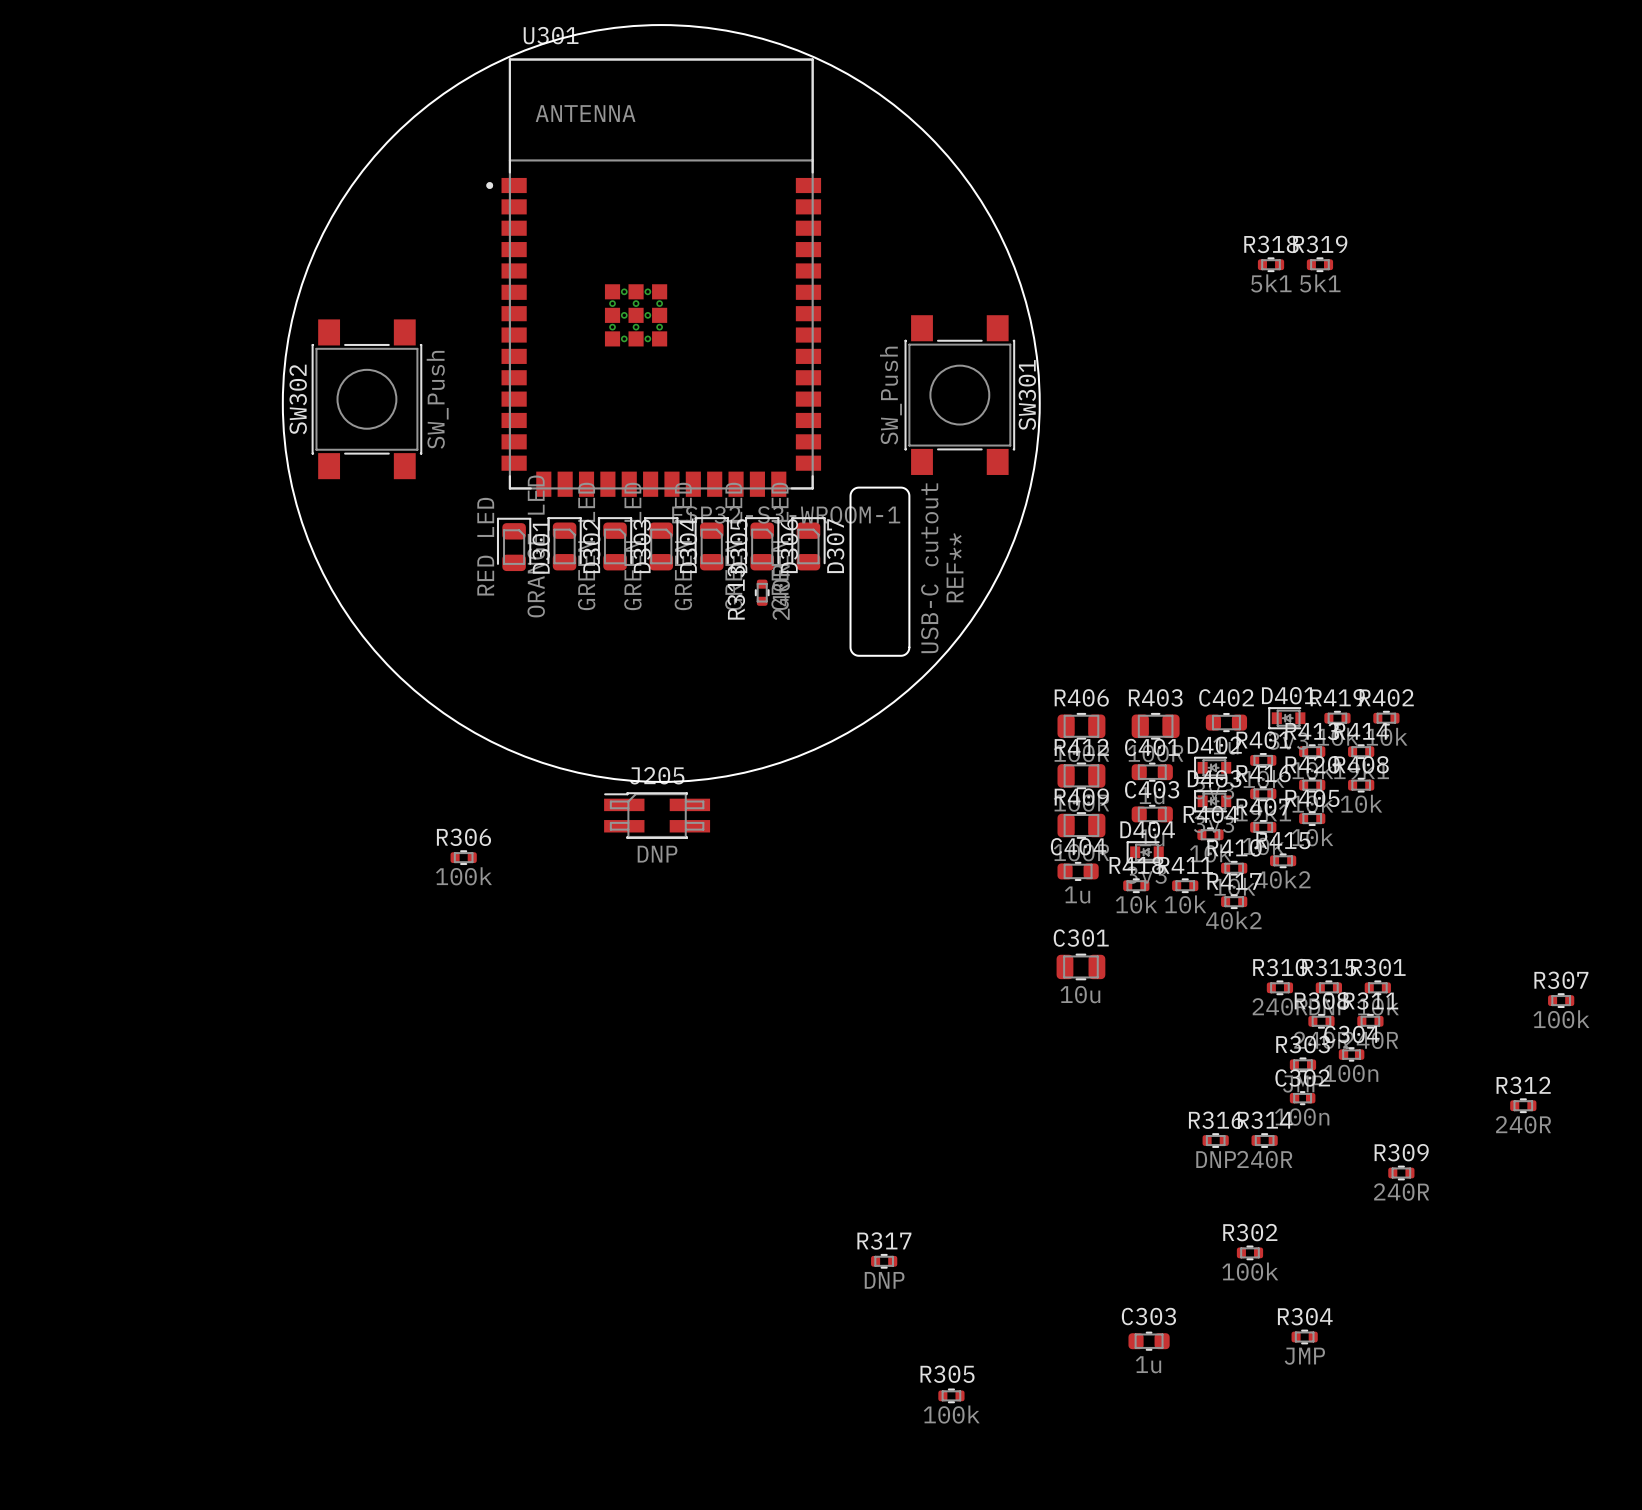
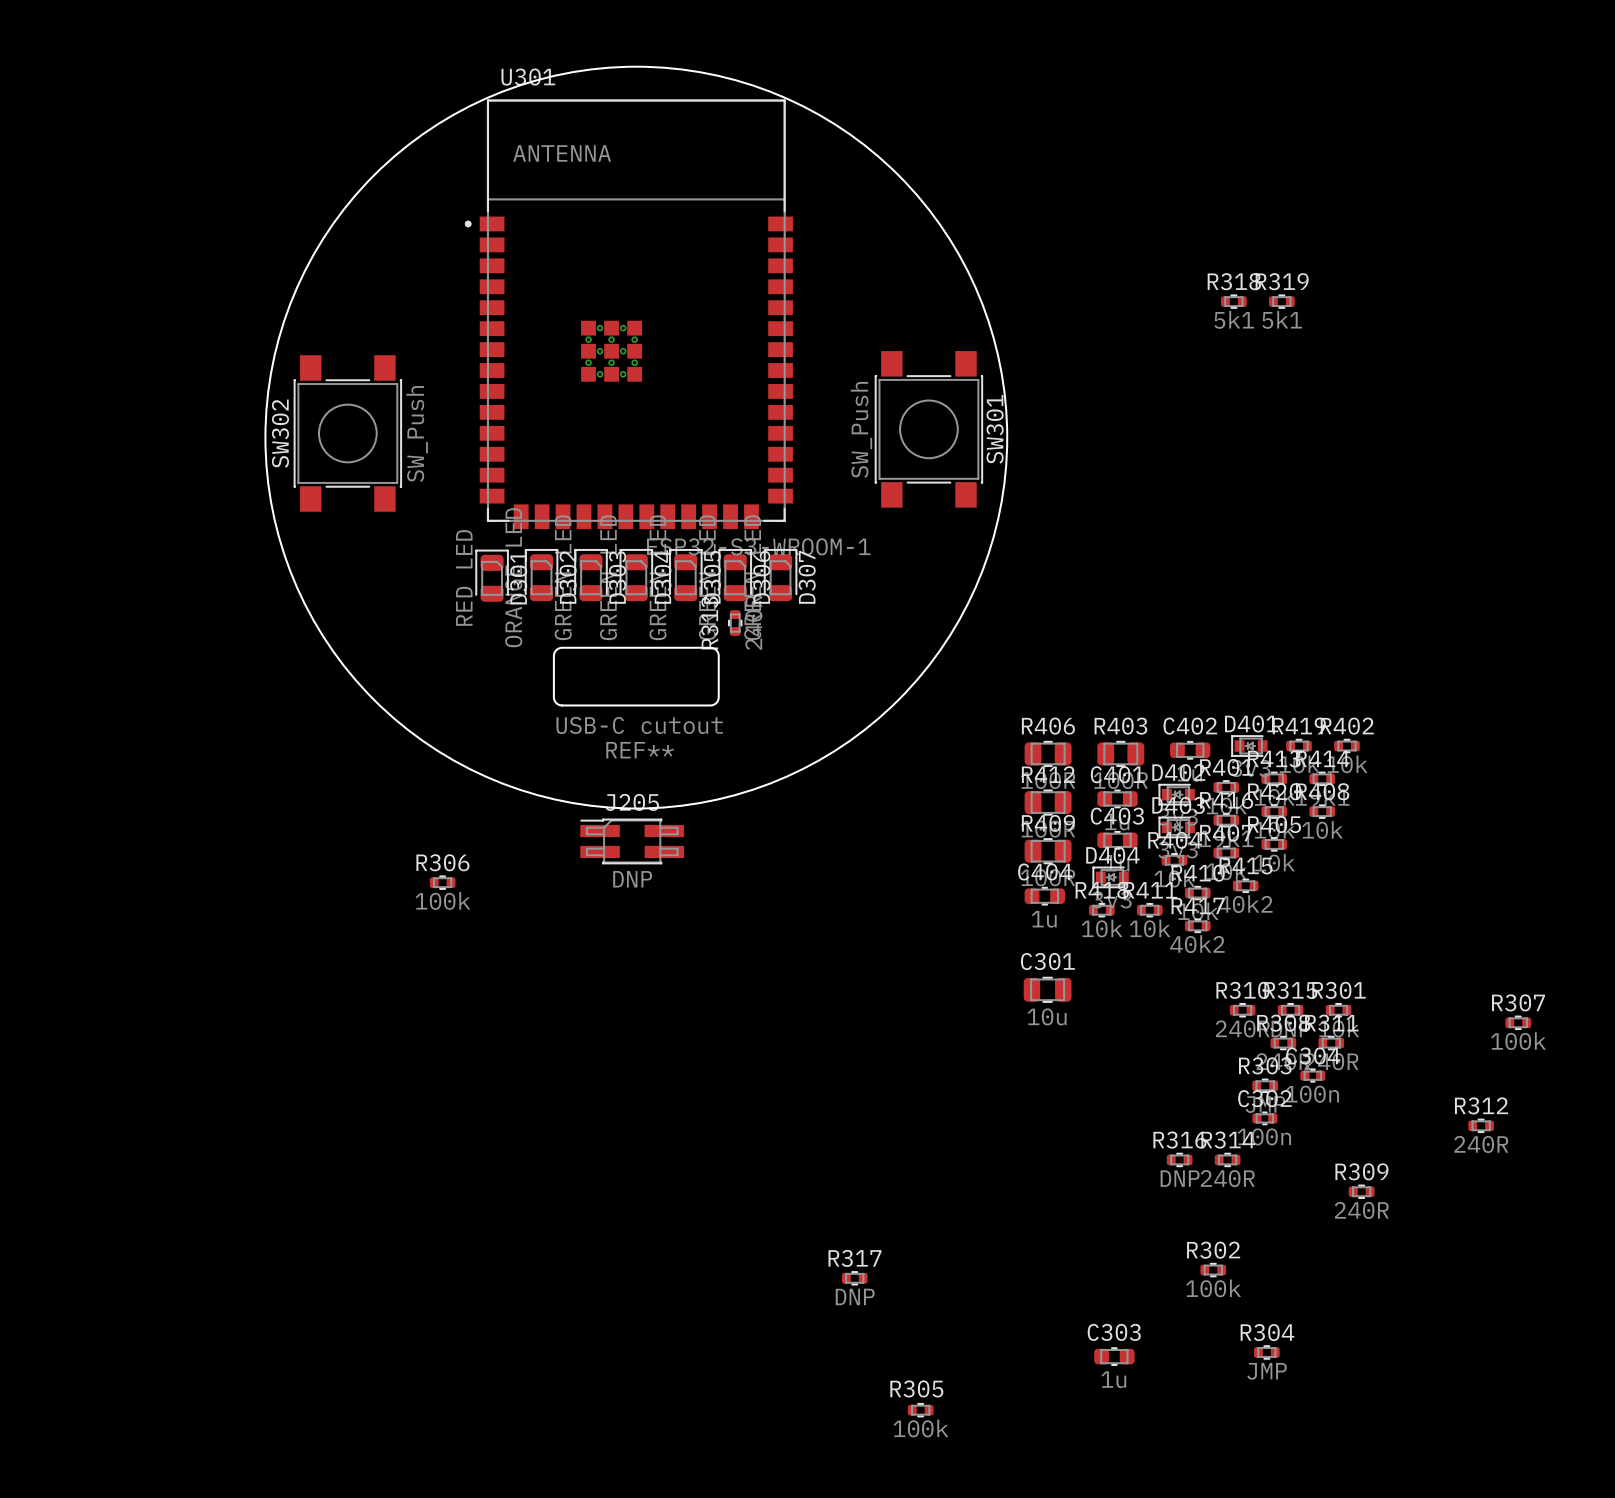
REF** rotation: 0° (879, 571) -> 90° clockwise (636, 676)
REF** position: (879, 571) -> (636, 676)

